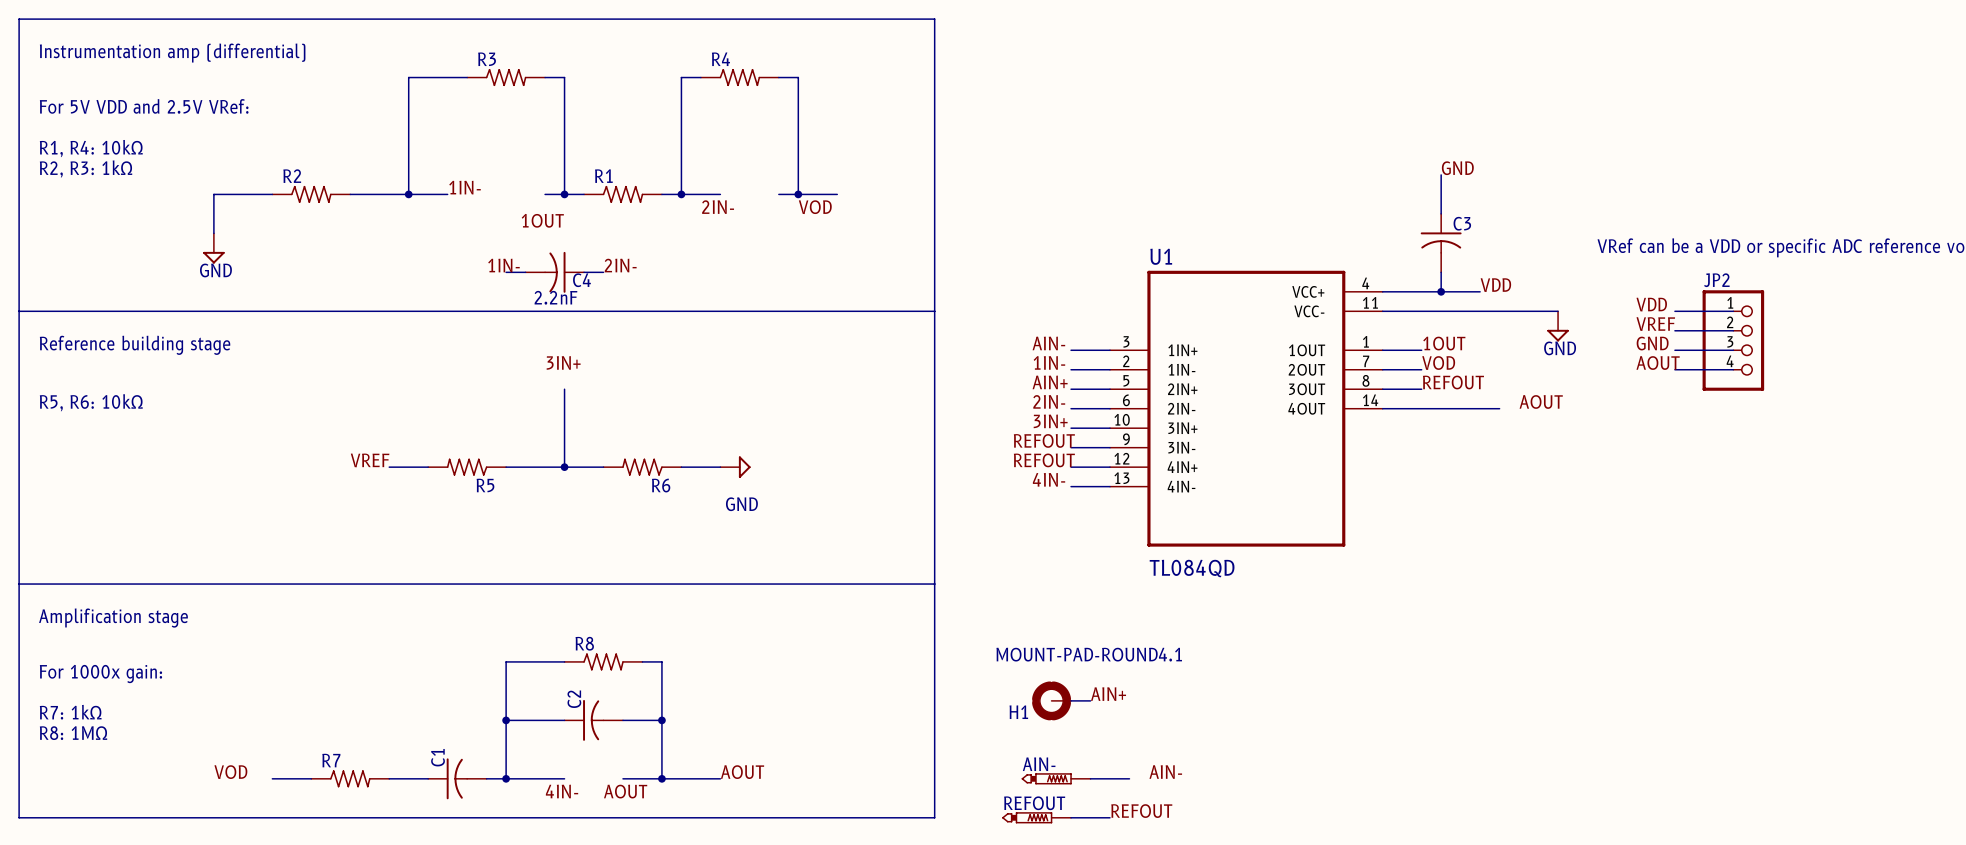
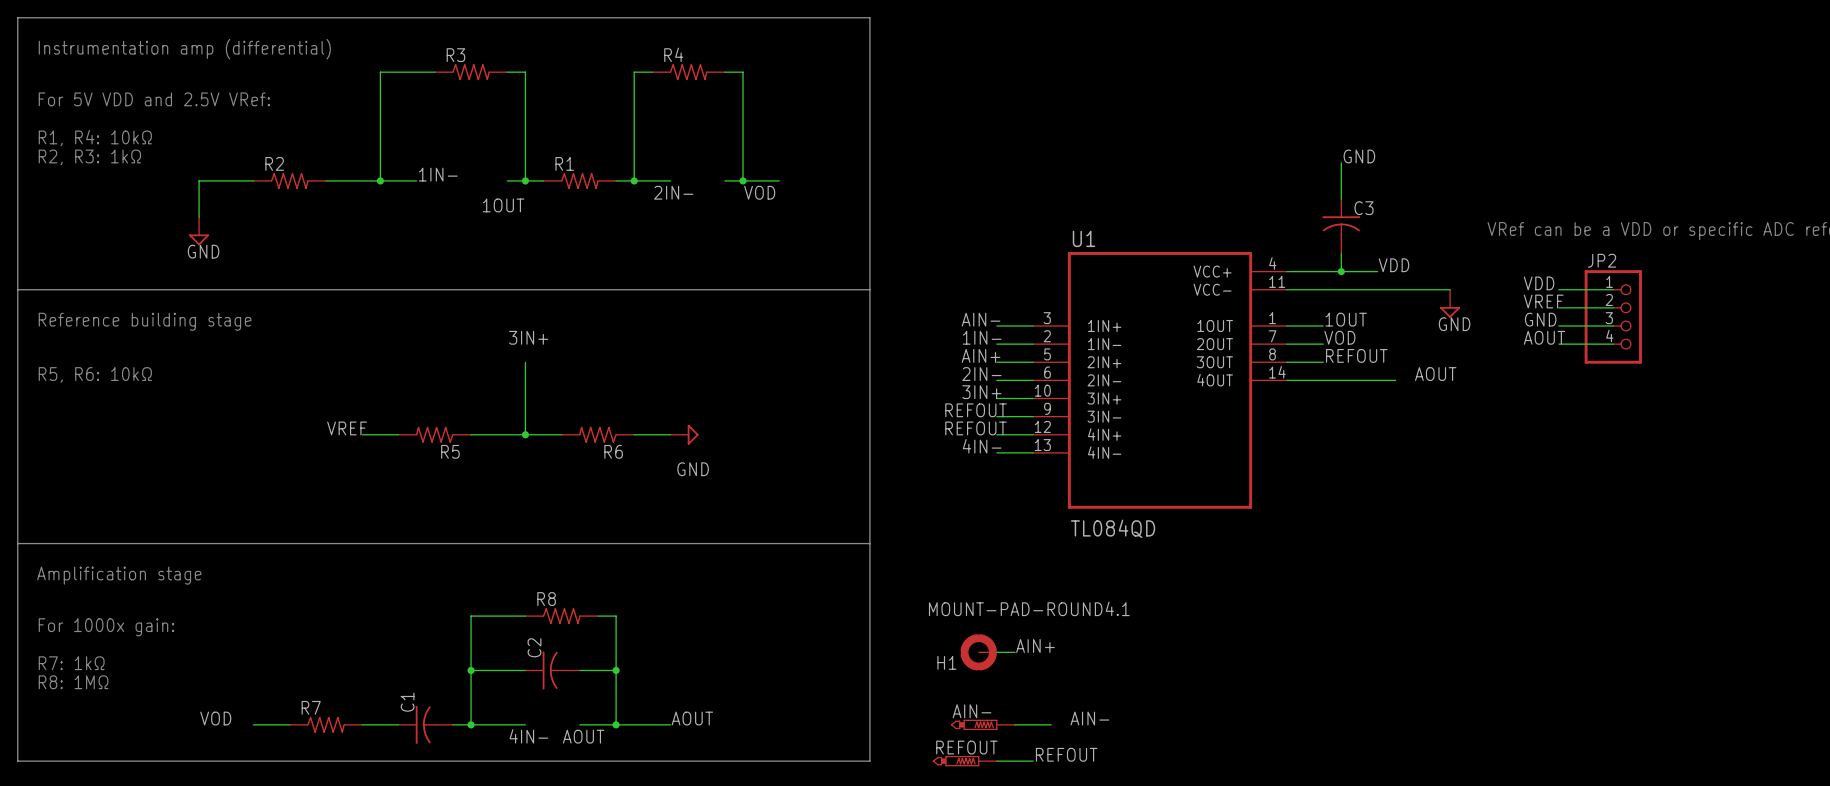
label: 1IN- (503, 265) -> none
label: 2IN- (620, 265) -> none
wire: (506, 272) (525, 272) -> none
C4: 2.2nF (554, 272) -> none
wire: (584, 272) (603, 272) -> none

